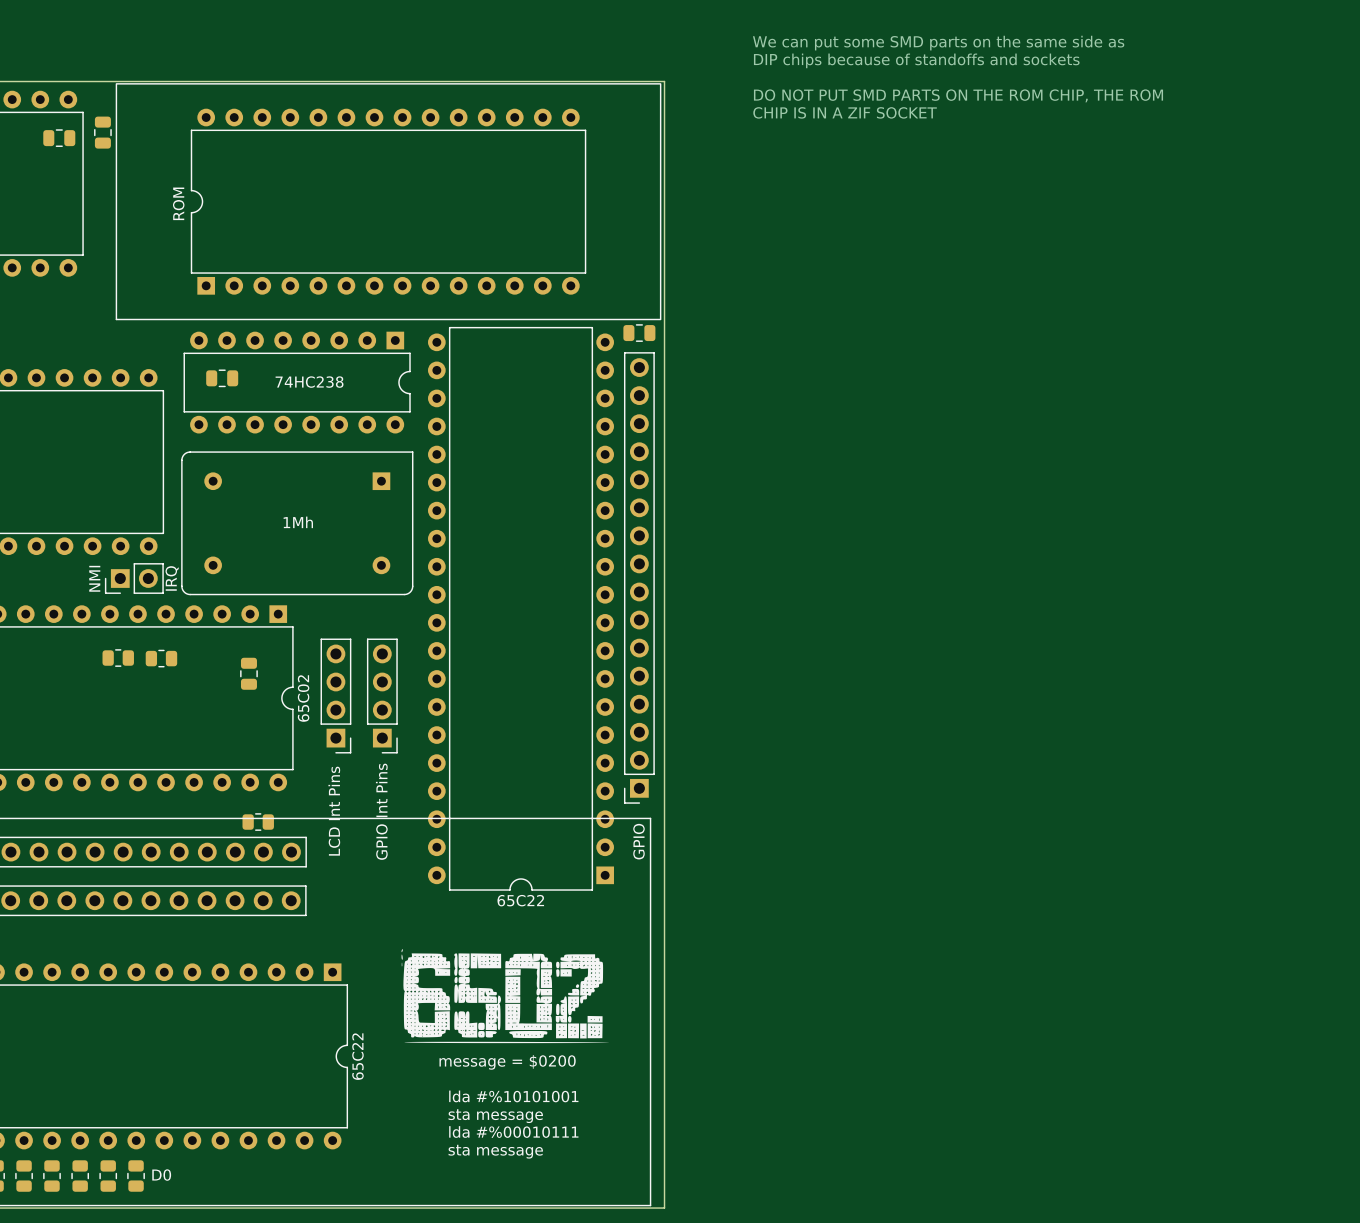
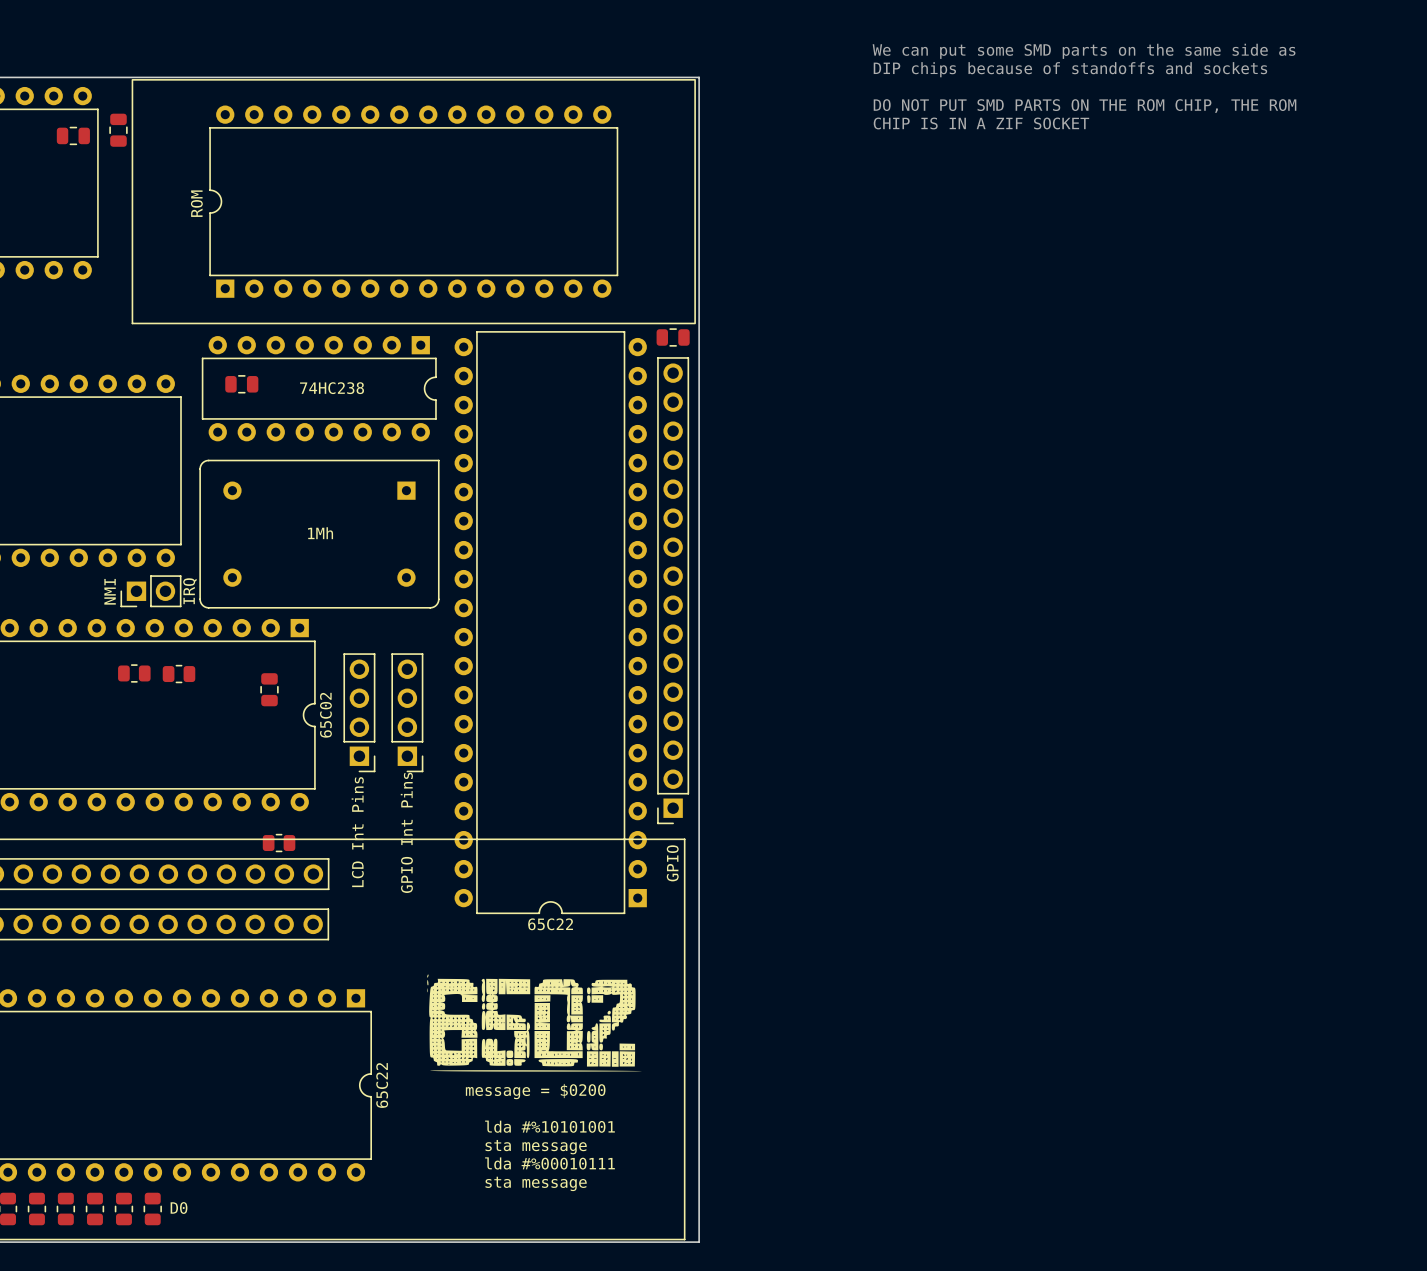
text position: We can put some SMD parts on the same side as (938, 43) -> We can put some SMD parts on the same side as (1084, 51)
text position: DIP chips because of standoffs and sockets (916, 60) -> DIP chips because of standoffs and sockets (1070, 69)
text position: DO NOT PUT SMD PARTS ON THE ROM CHIP, THE ROM (958, 95) -> DO NOT PUT SMD PARTS ON THE ROM CHIP, THE ROM (1085, 106)
text position: CHIP IS IN A ZIF SOCKET (845, 112) -> CHIP IS IN A ZIF SOCKET (981, 123)

